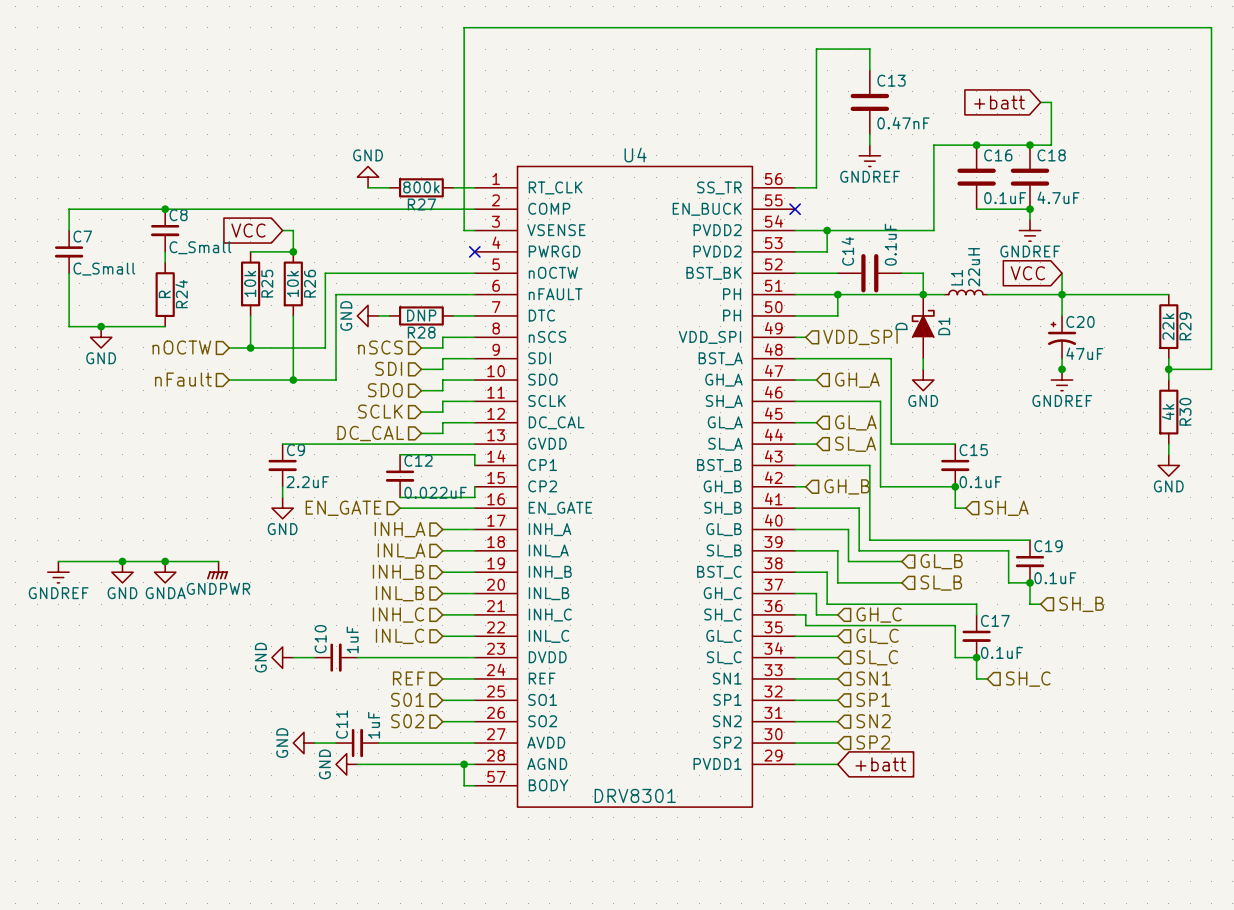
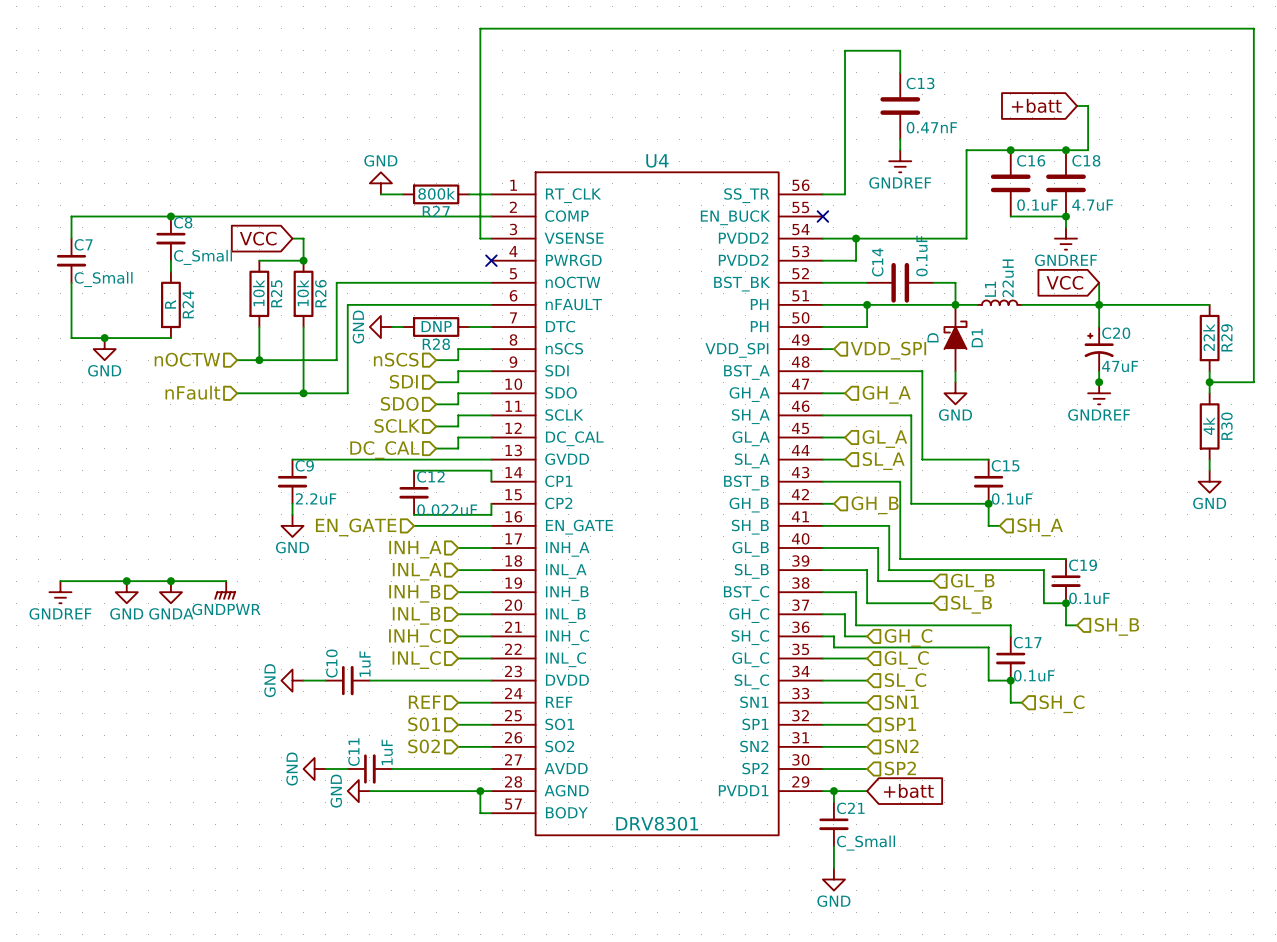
wire: none -> (833, 791) (833, 802)
junction: none -> (833, 791)
C21: none -> C_Small (833, 824)
wire: none -> (833, 846) (833, 868)
power symbol: none -> GND (833, 879)

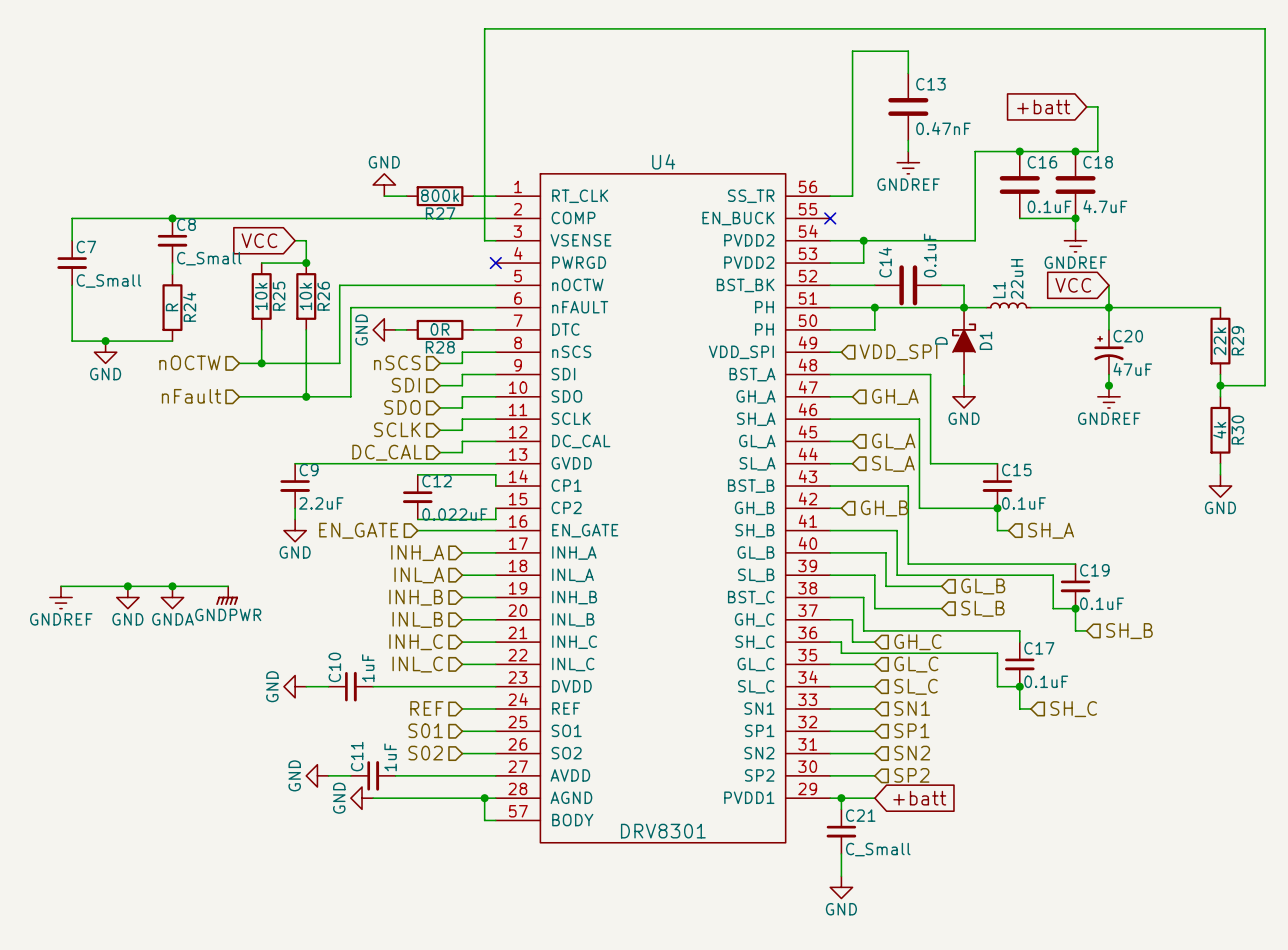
R28 value: DNP (436, 326) -> 0R (440, 329)

